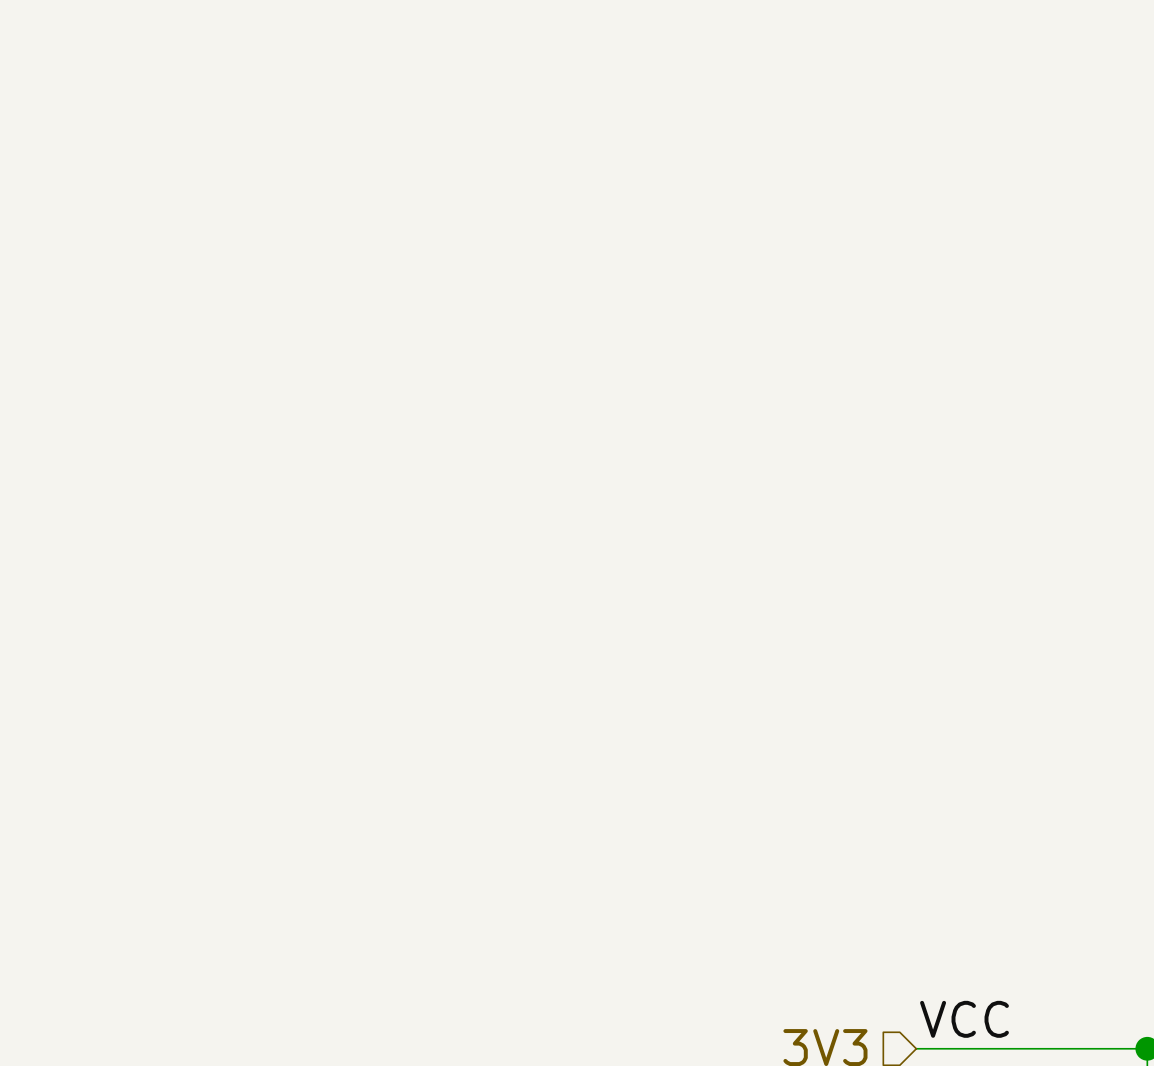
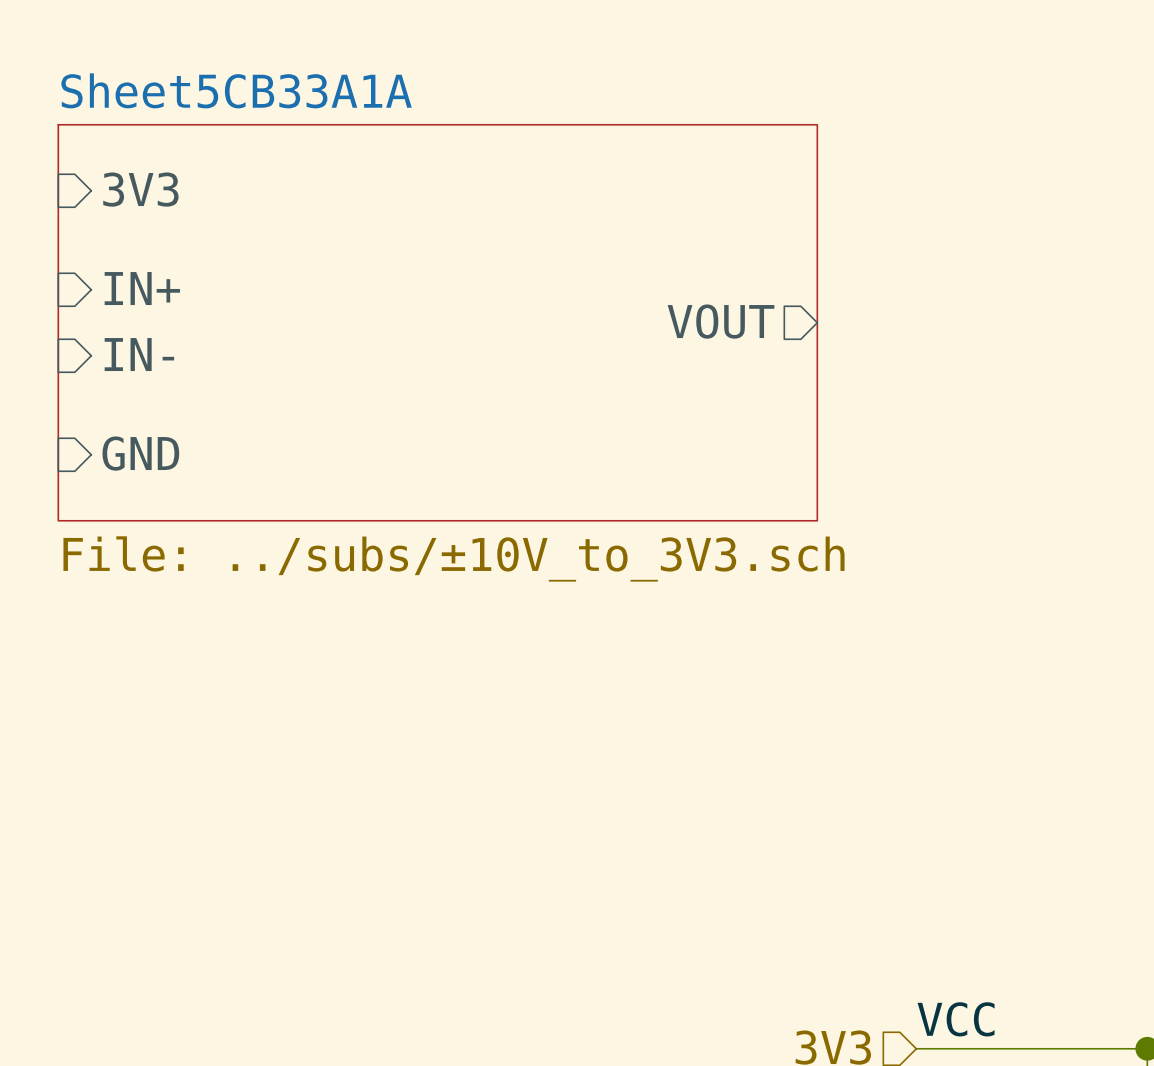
sheet pin: none -> 3V3 (140, 189)
sheet pin: none -> IN+ (142, 288)
sheet pin: none -> VOUT (721, 321)
sheet Sheet5CB33A1A: none -> File: ../subs/±10V_to_3V3.sch (437, 322)
sheet pin: none -> IN- (139, 354)
sheet pin: none -> GND (140, 453)

